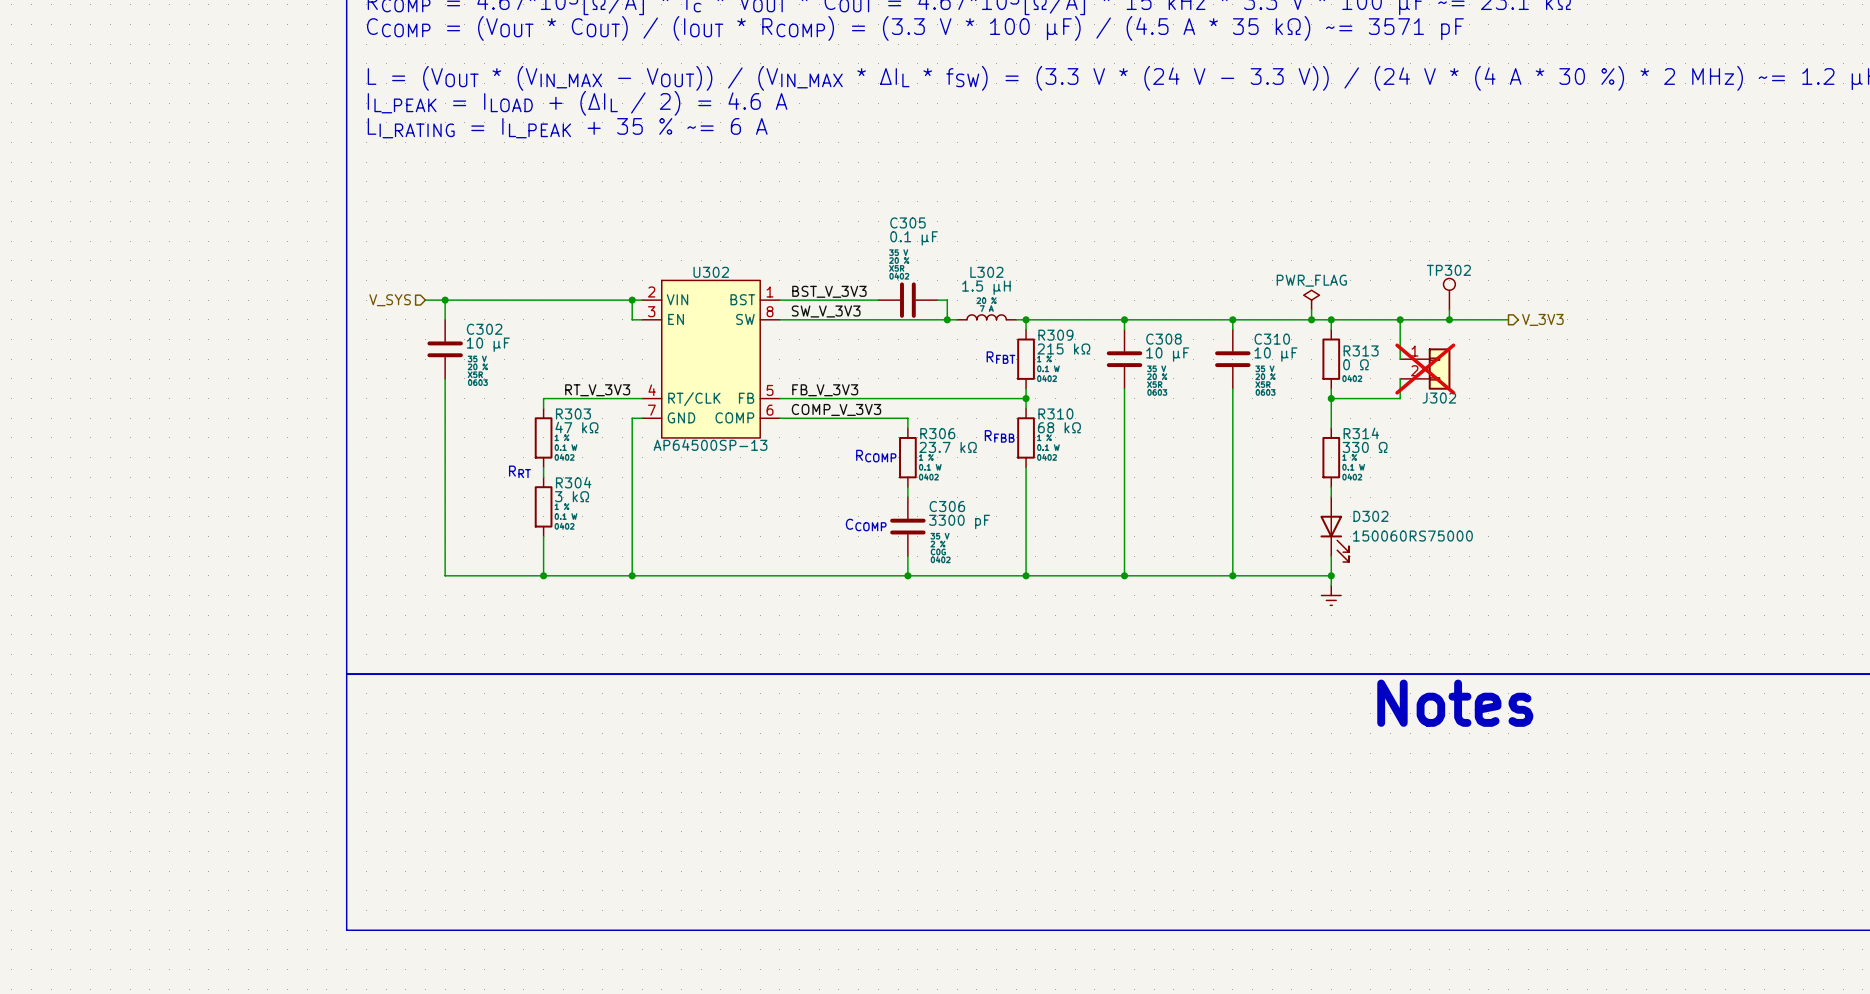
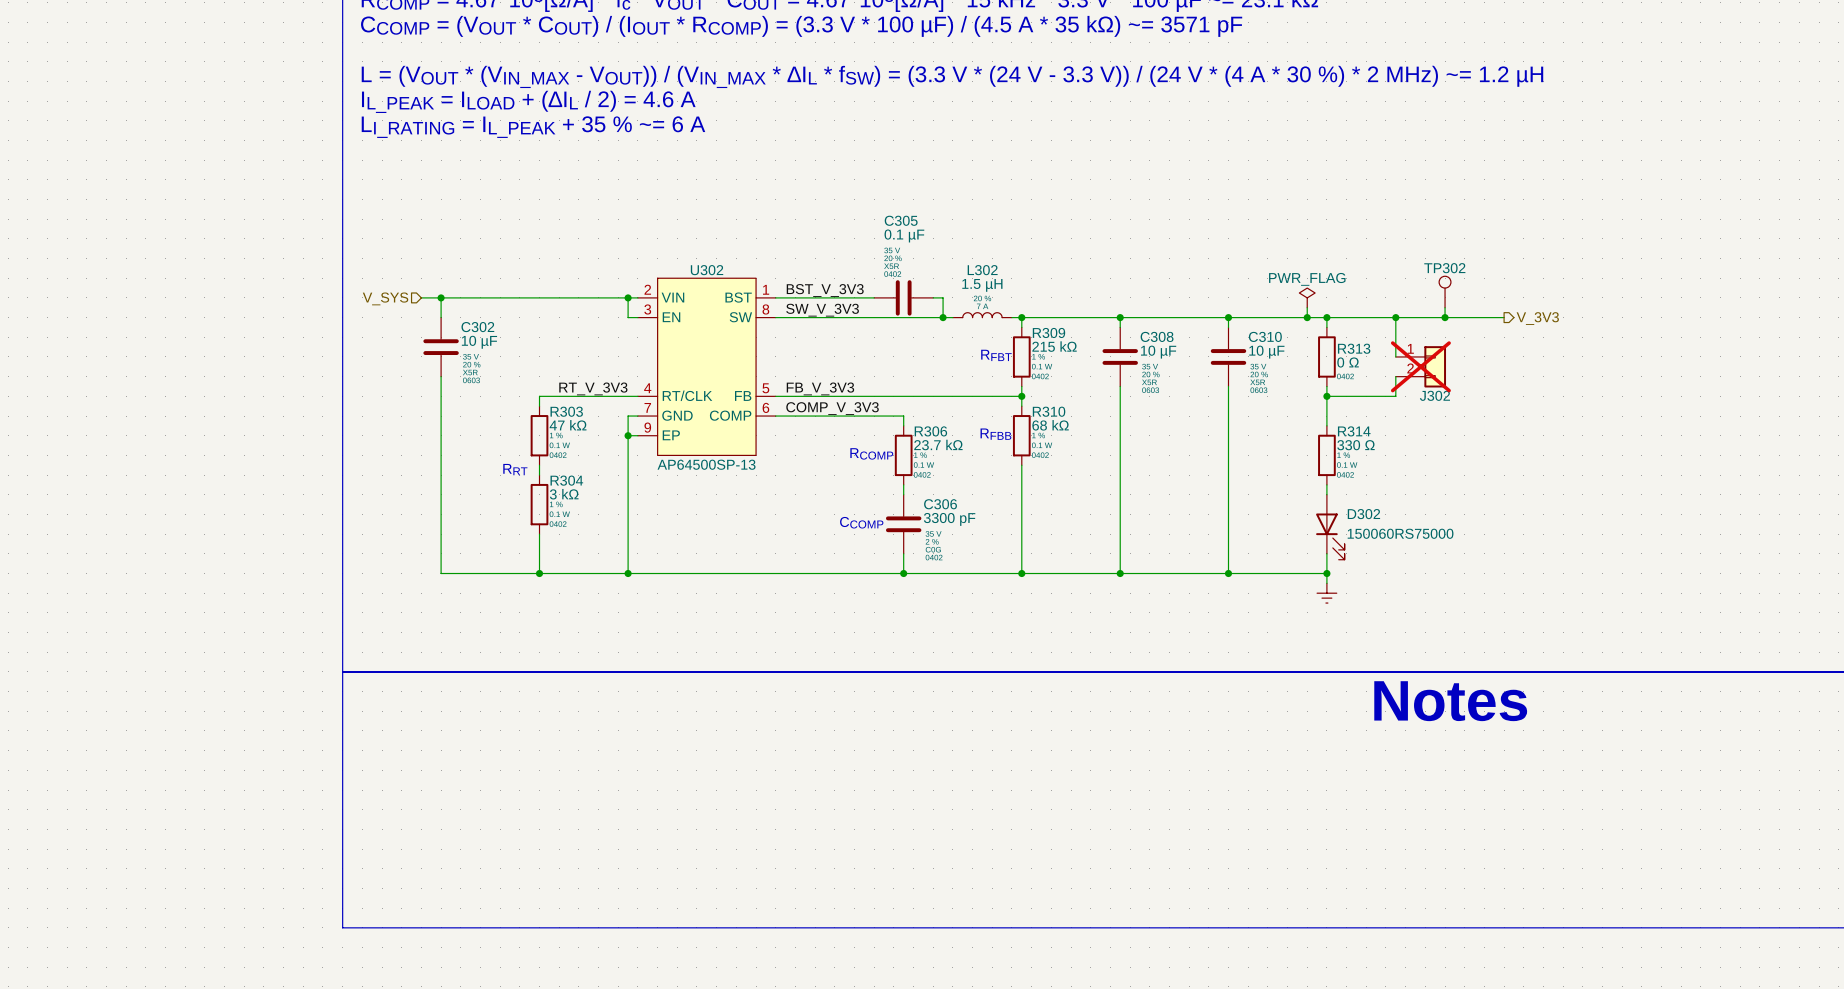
U302 symbol: [642, 280, 780, 438] -> [637, 278, 776, 456]
wire: none -> (628, 435) (637, 435)
junction: none -> (628, 435)

